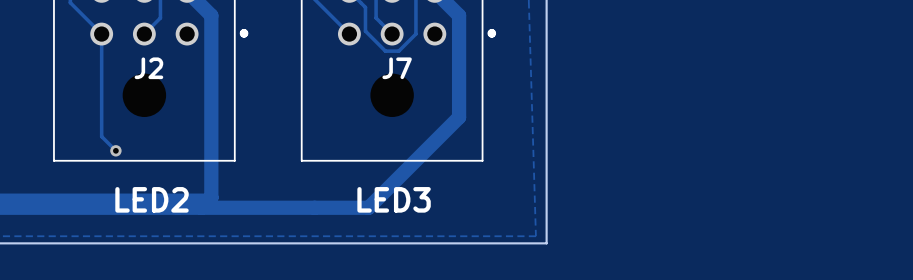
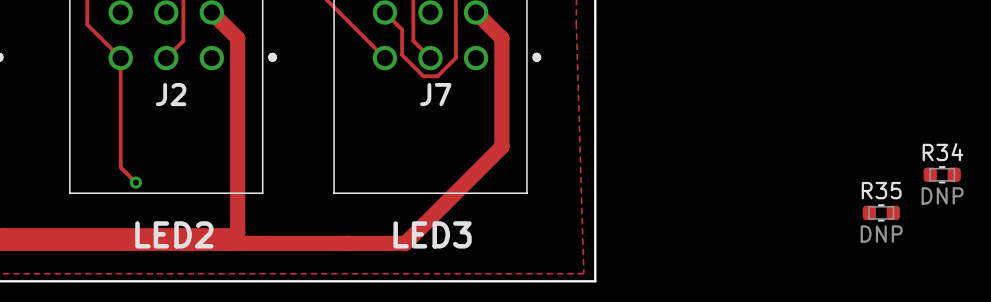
R34: none -> DNP (942, 174)
R35: none -> DNP (881, 212)

